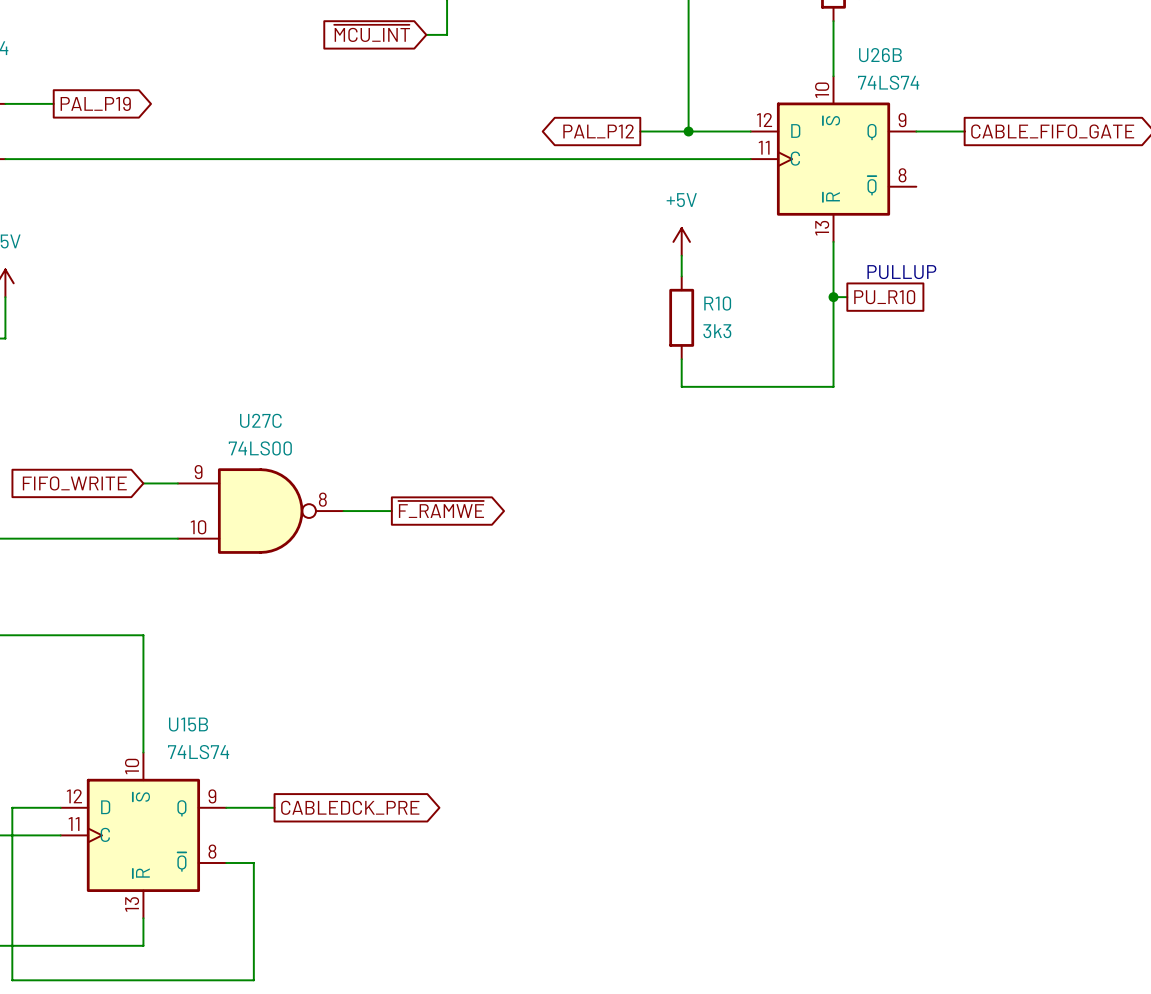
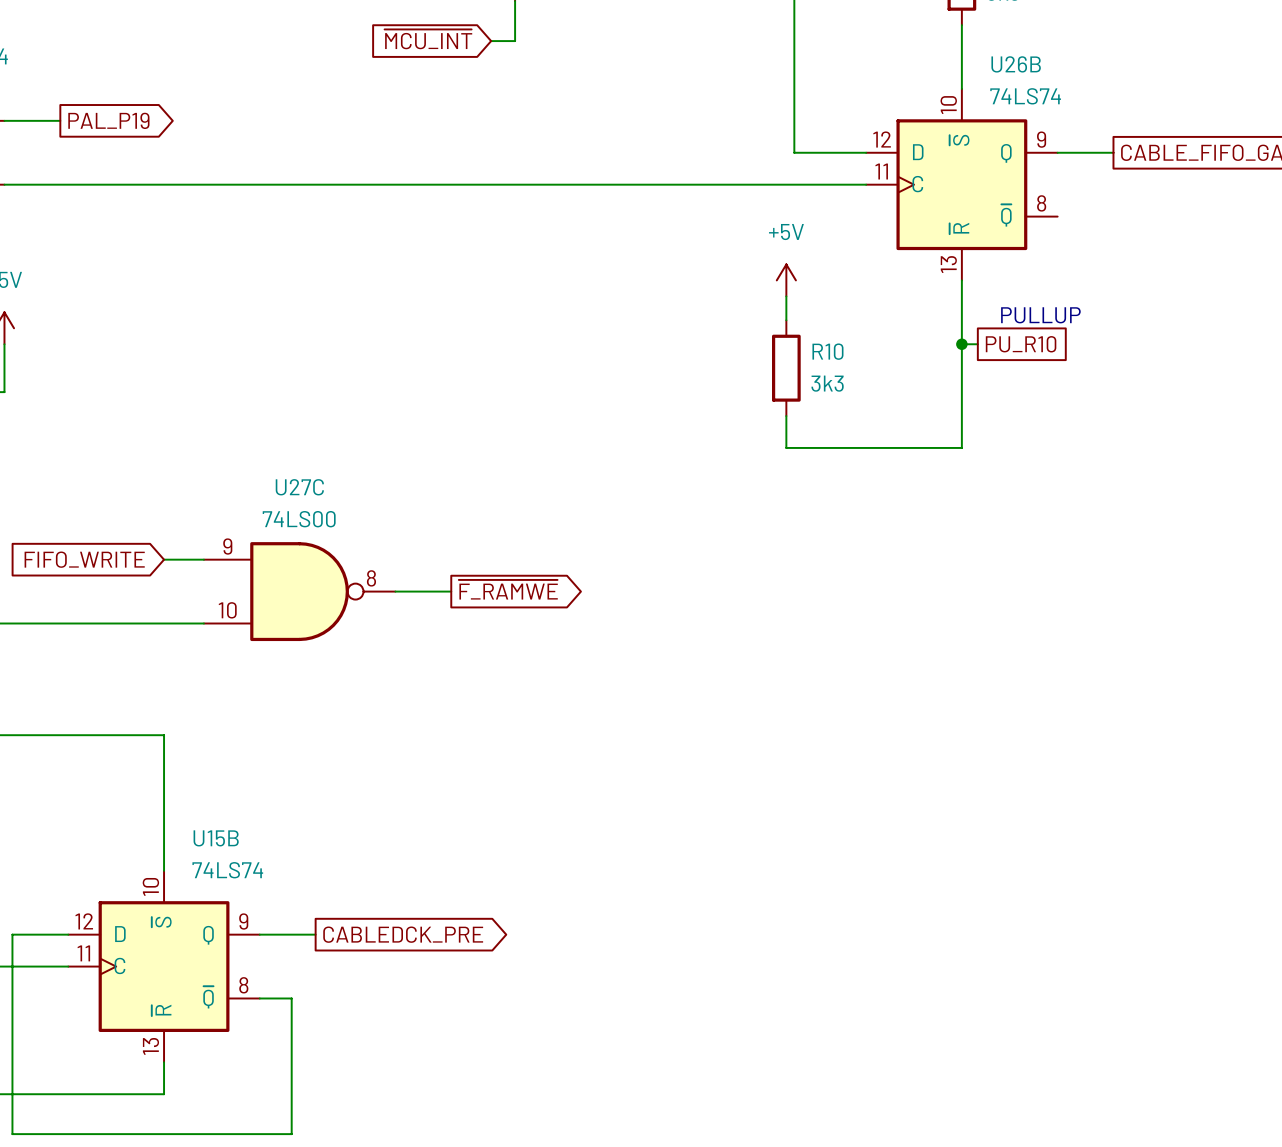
global label: PAL_P12 (598, 131) -> none
wire: (640, 131) (688, 131) -> none
junction: (688, 131) -> none

